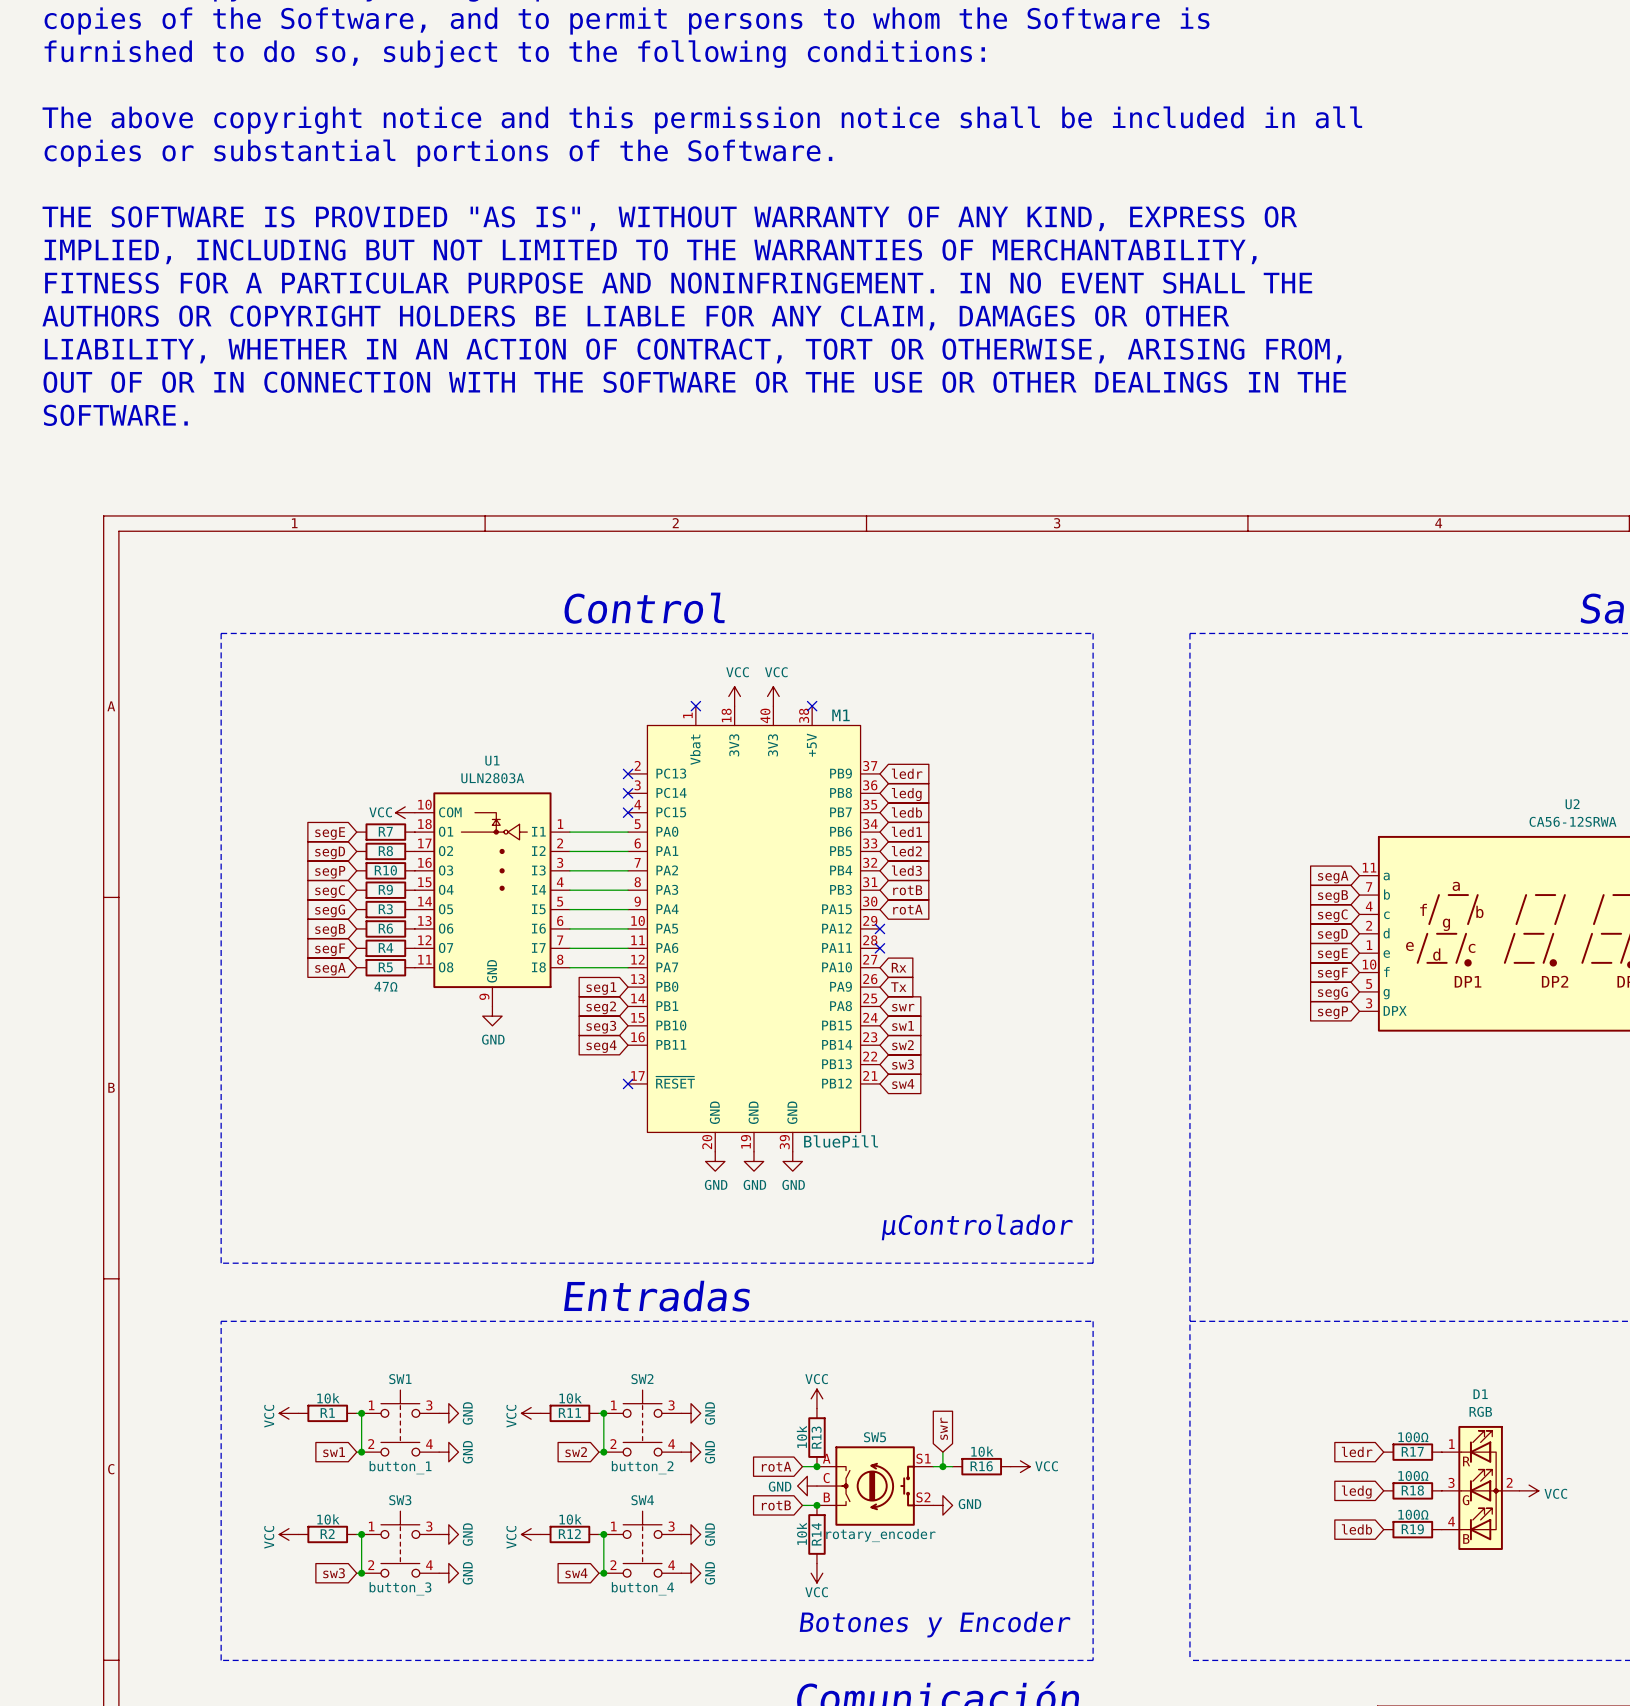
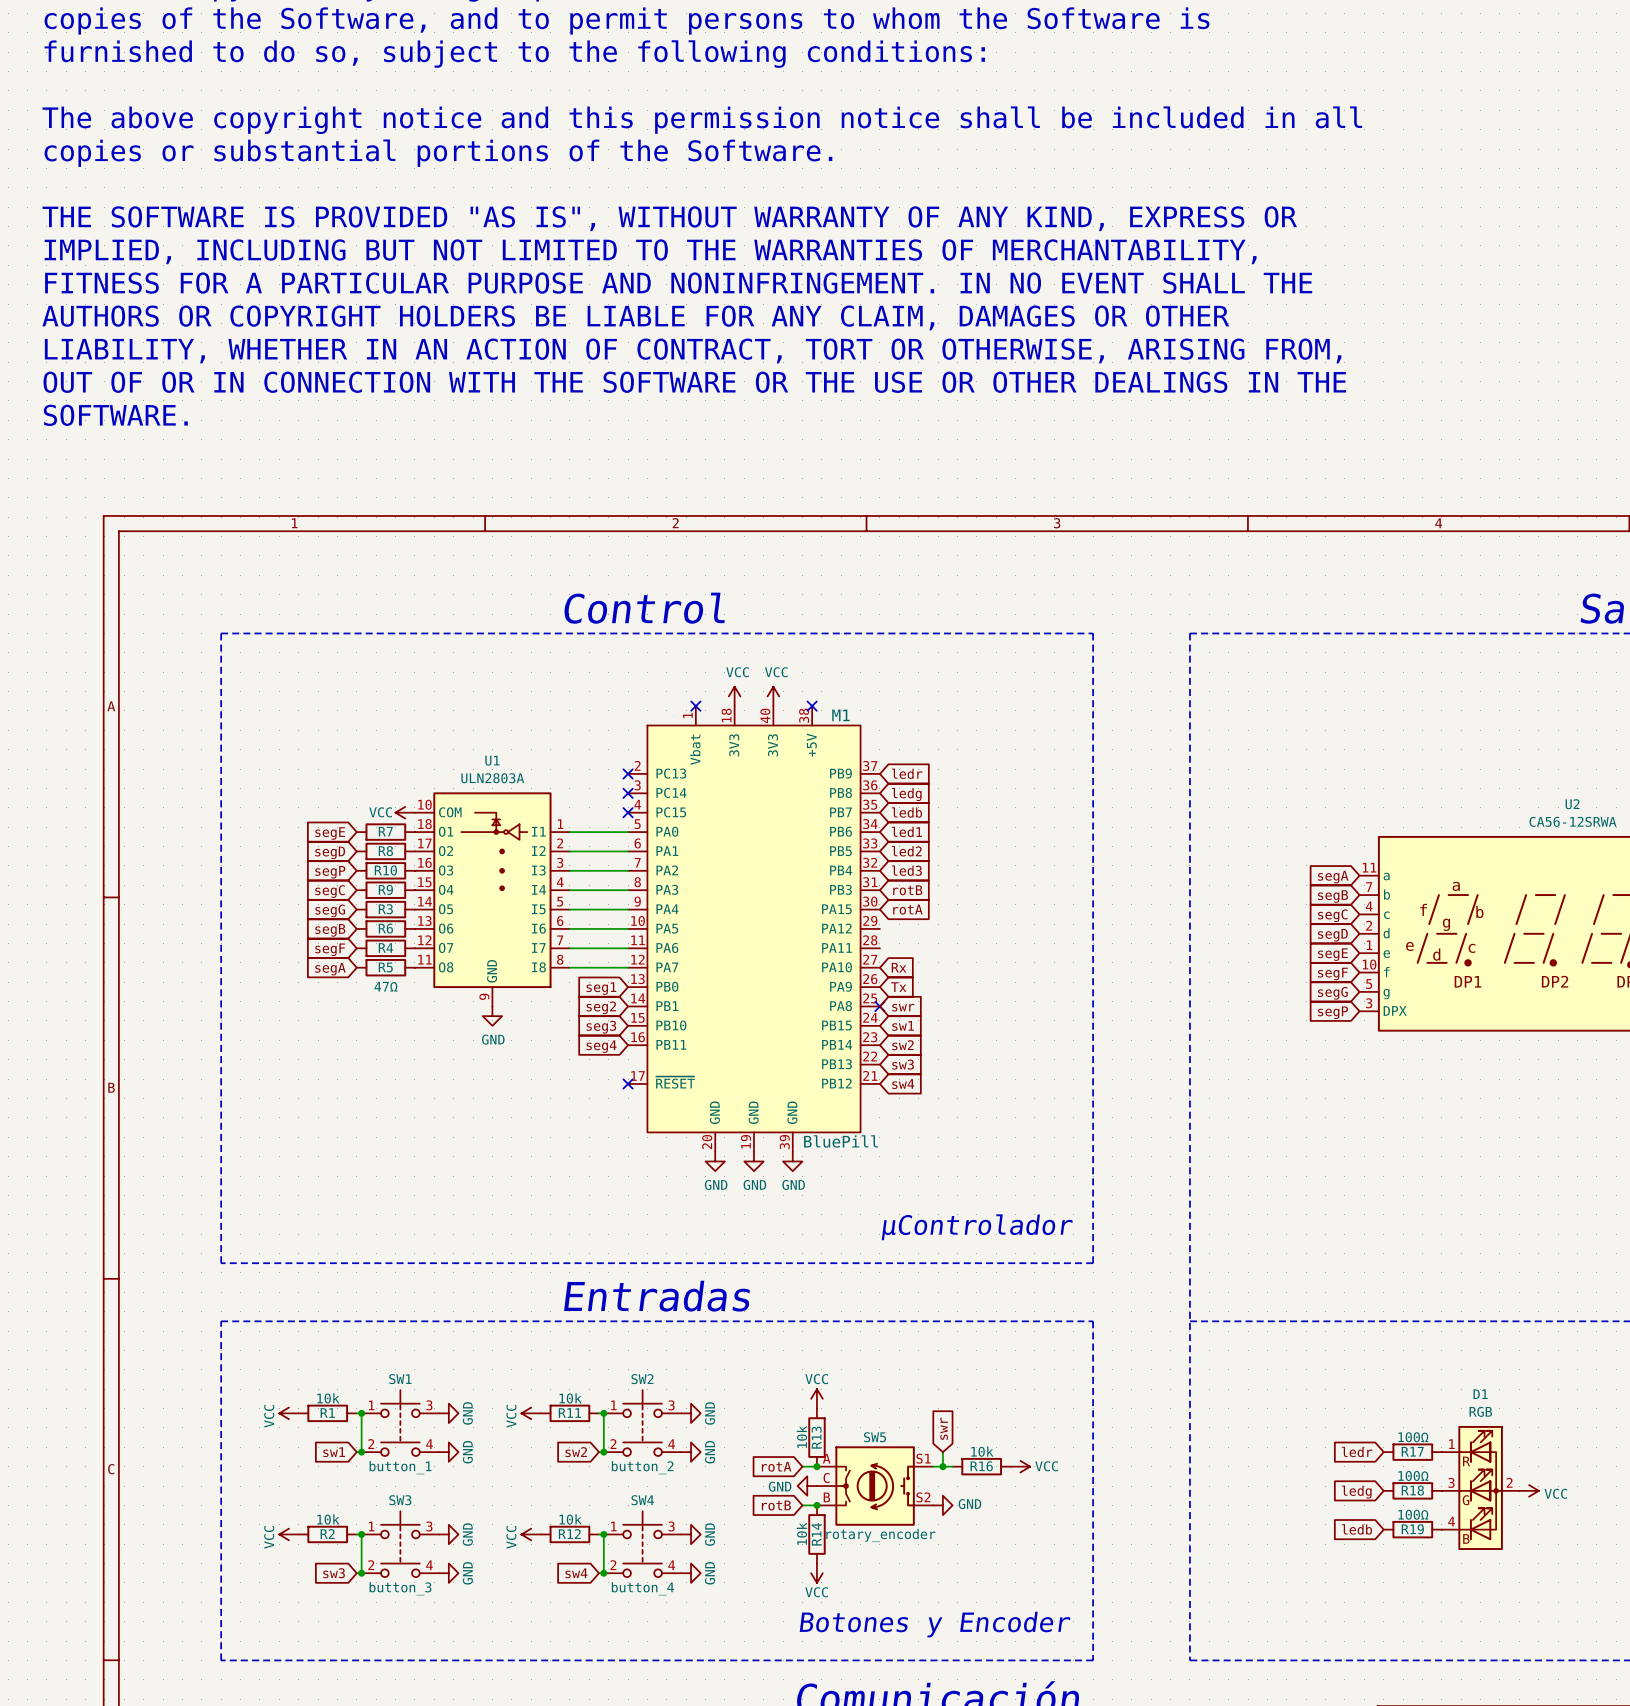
no-connect mark: (879, 928) -> none
no-connect mark: (879, 948) -> none
no-connect mark: none -> (879, 1006)

